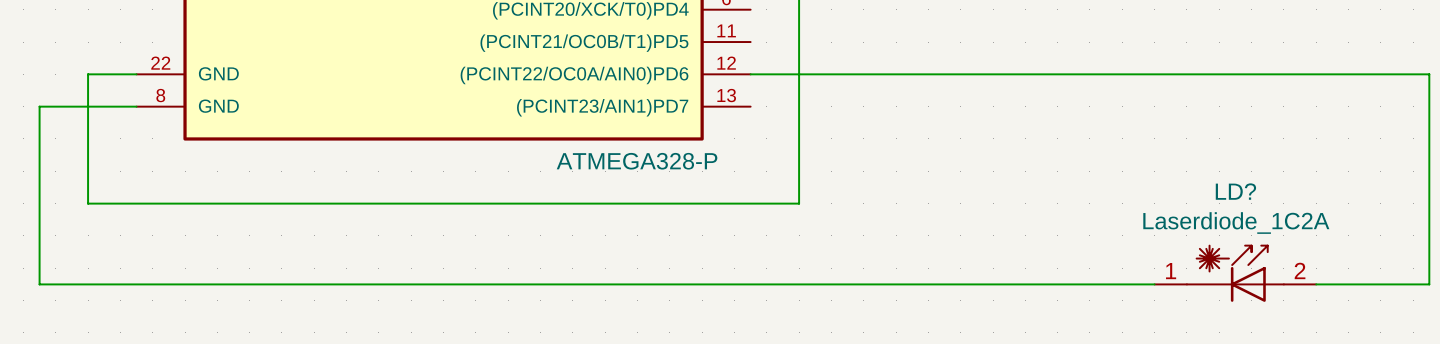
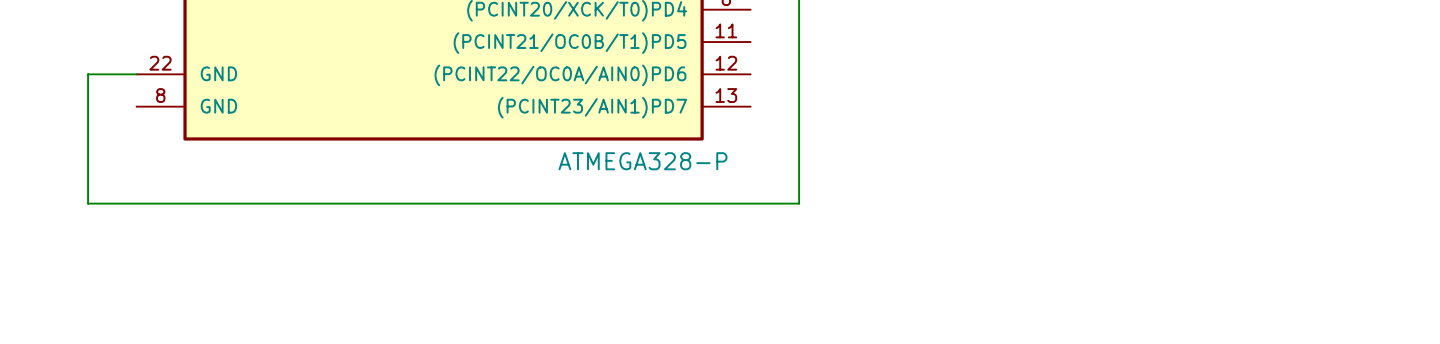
wire: (750, 74) (1429, 74) (1429, 284) (1316, 284) -> none
wire: (136, 106) (39, 106) (39, 284) (1154, 284) -> none
LD?: Laserdiode_1C2A (1235, 273) -> none

